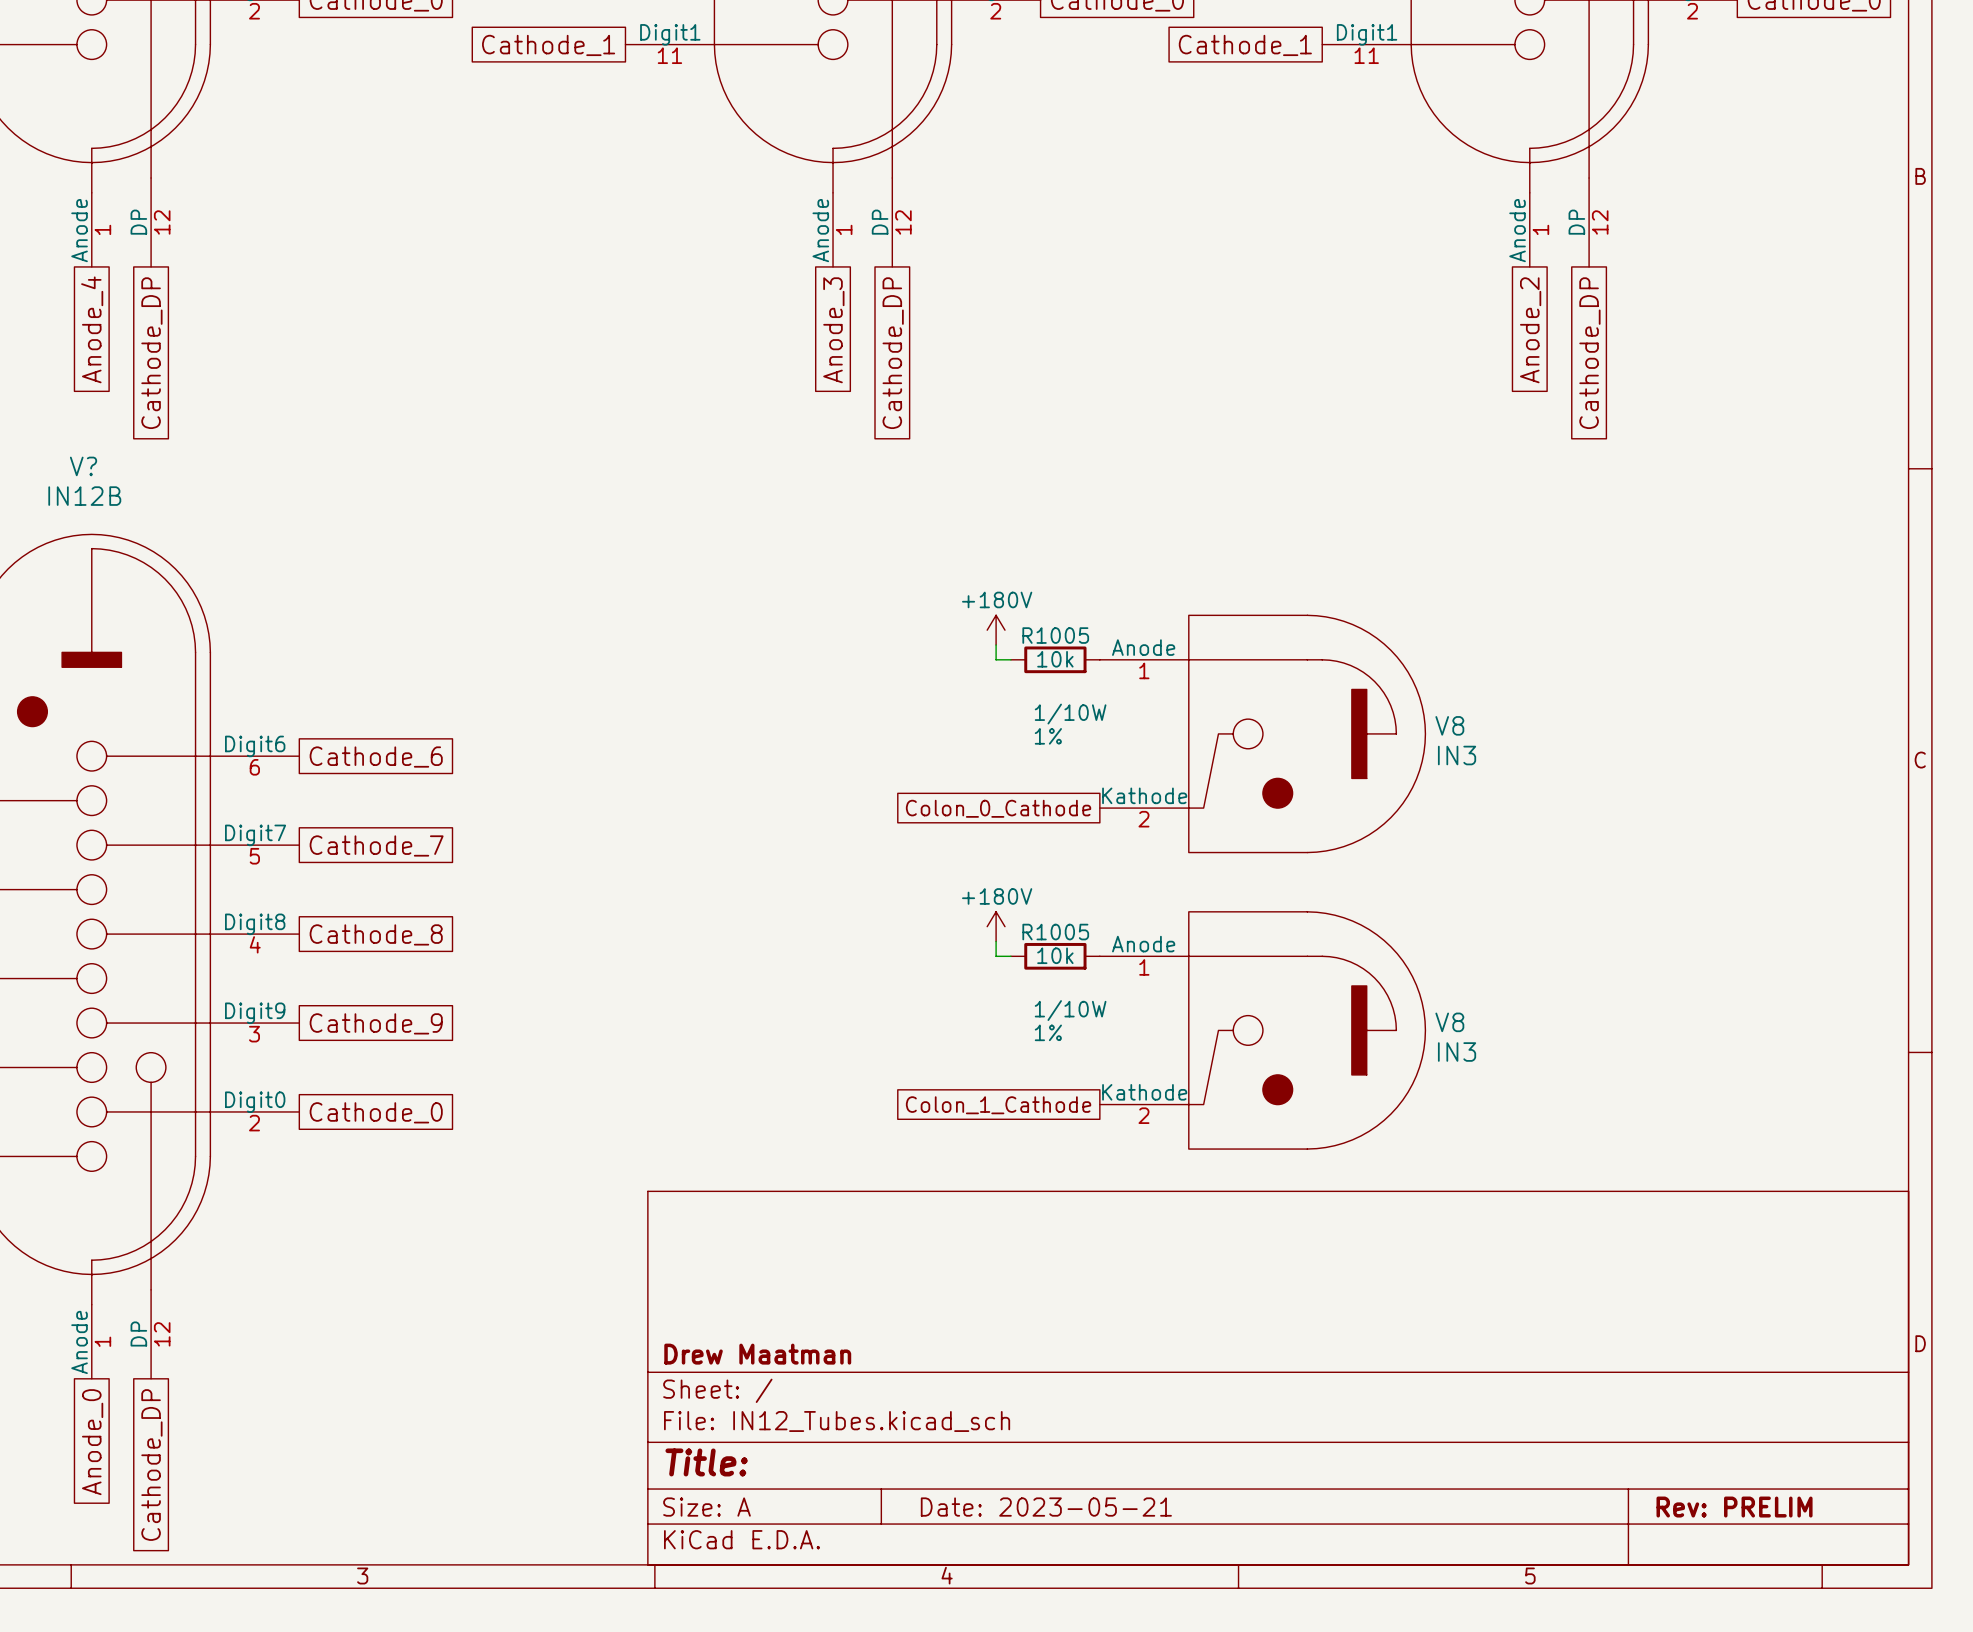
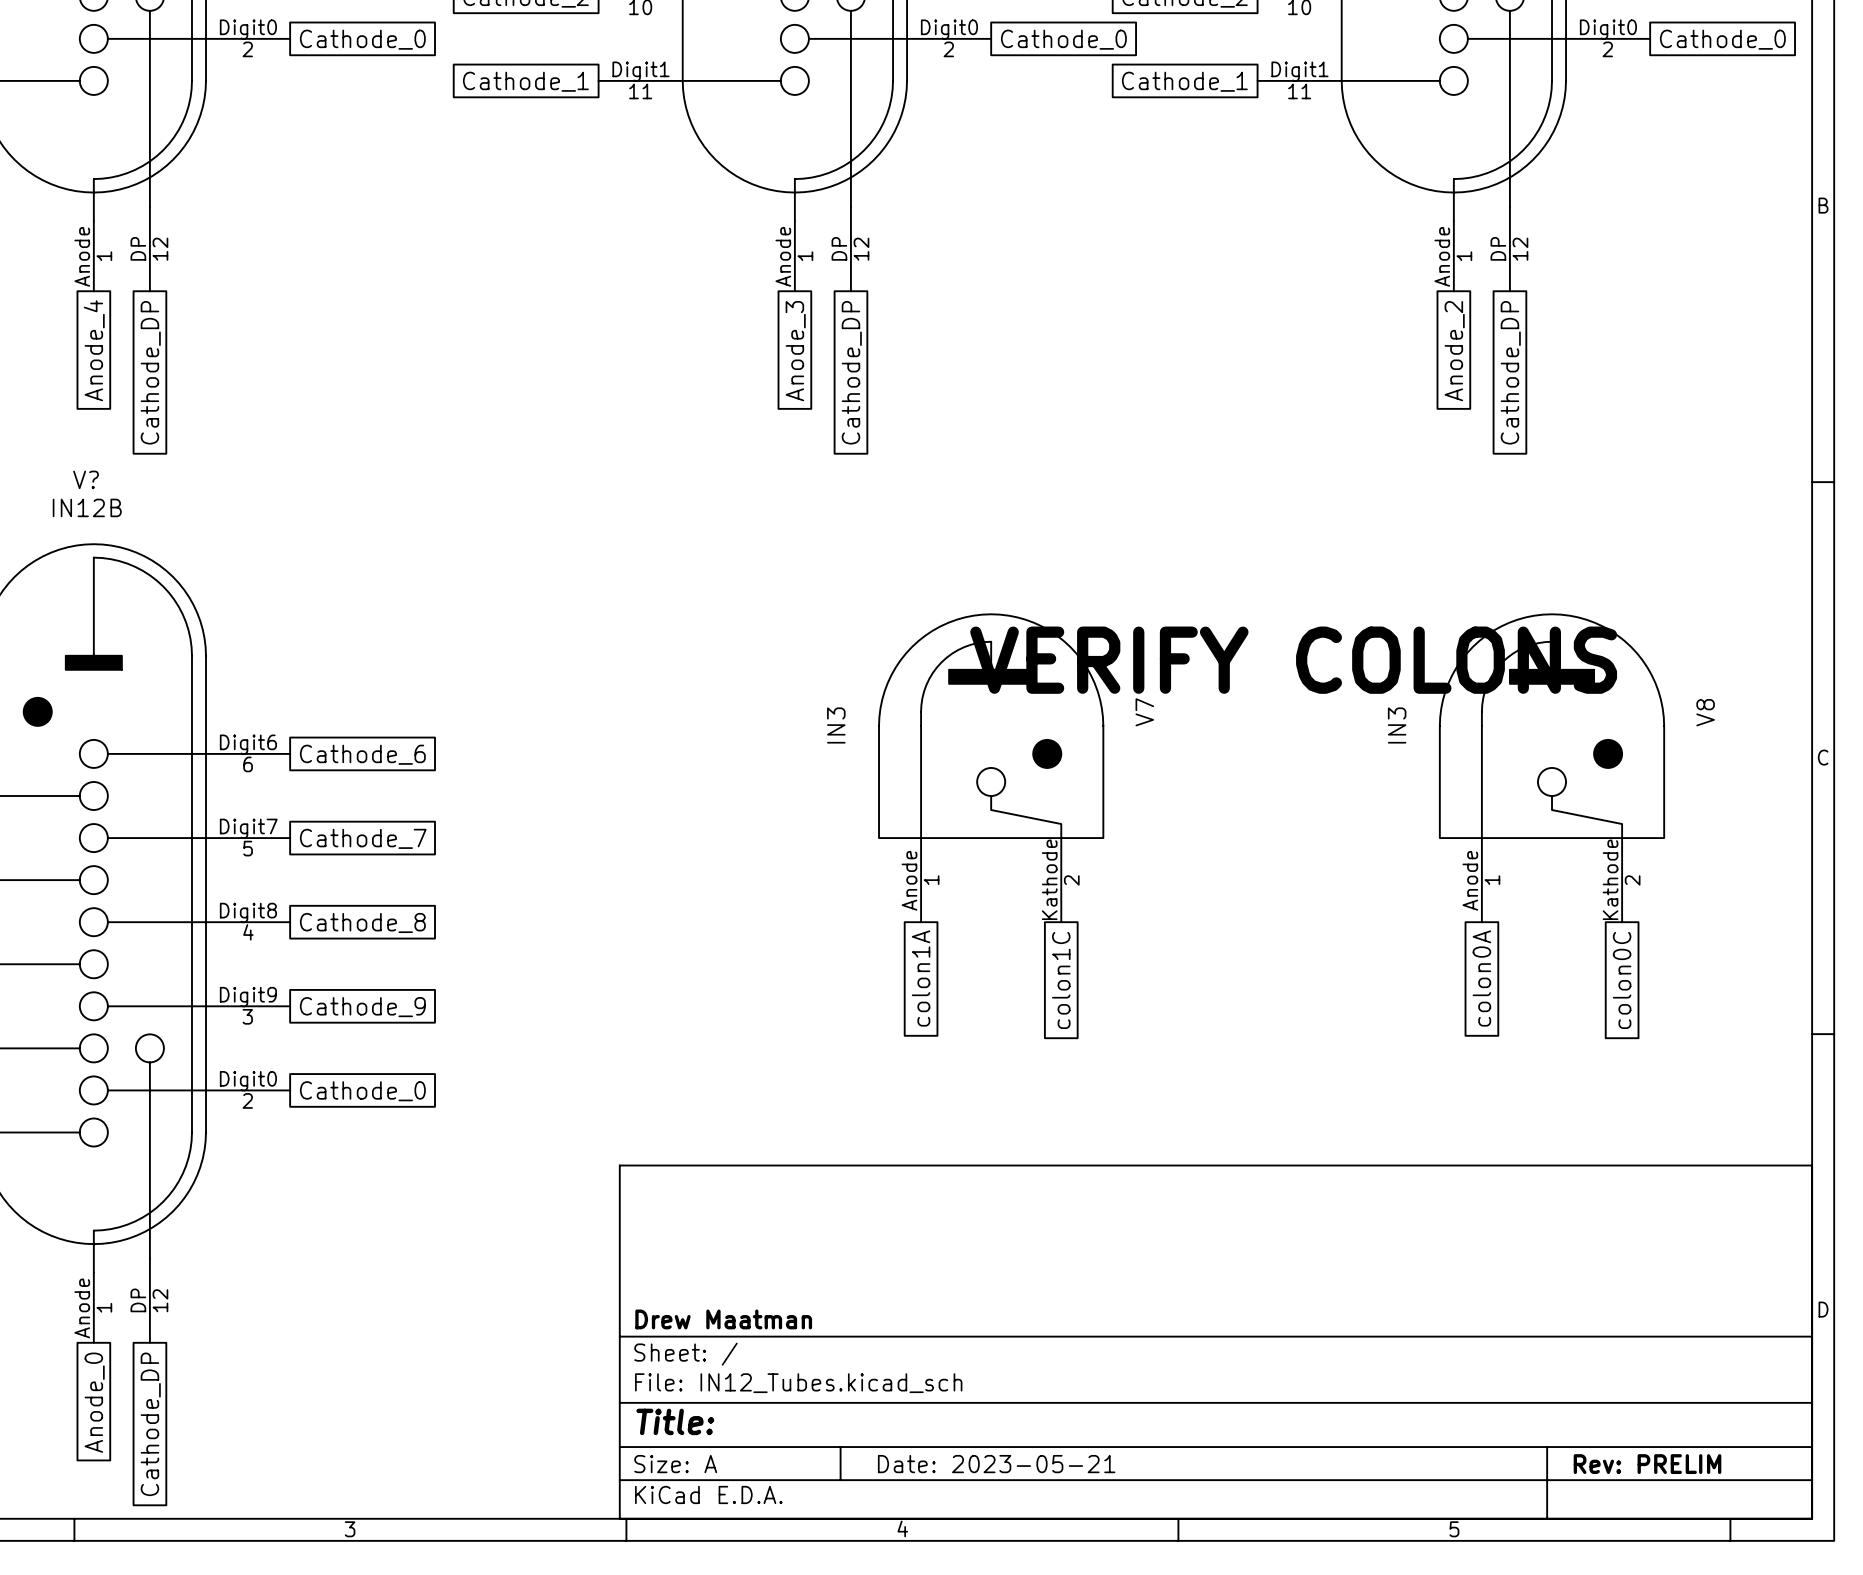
power symbol: +180V (996, 630) -> none
wire: (996, 644) (996, 659) (1010, 659) -> none
text: none -> VERIFY COLONS (1293, 660)
R1005: 10k (1055, 659) -> none
V8: IN3 (1262, 733) -> none
V7: none -> IN3 (991, 768)
V8: none -> IN3 (1552, 768)
global label: Colon_0_Cathode (998, 808) -> none
power symbol: +180V (996, 926) -> none
wire: (996, 941) (996, 956) (1010, 956) -> none
R1005: 10k (1055, 956) -> none
global label: none -> colon1A (921, 978)
global label: none -> colon0A (1481, 978)
global label: none -> colon1C (1061, 980)
global label: none -> colon0C (1622, 980)
V8: IN3 (1262, 1030) -> none
global label: Colon_1_Cathode (998, 1105) -> none

